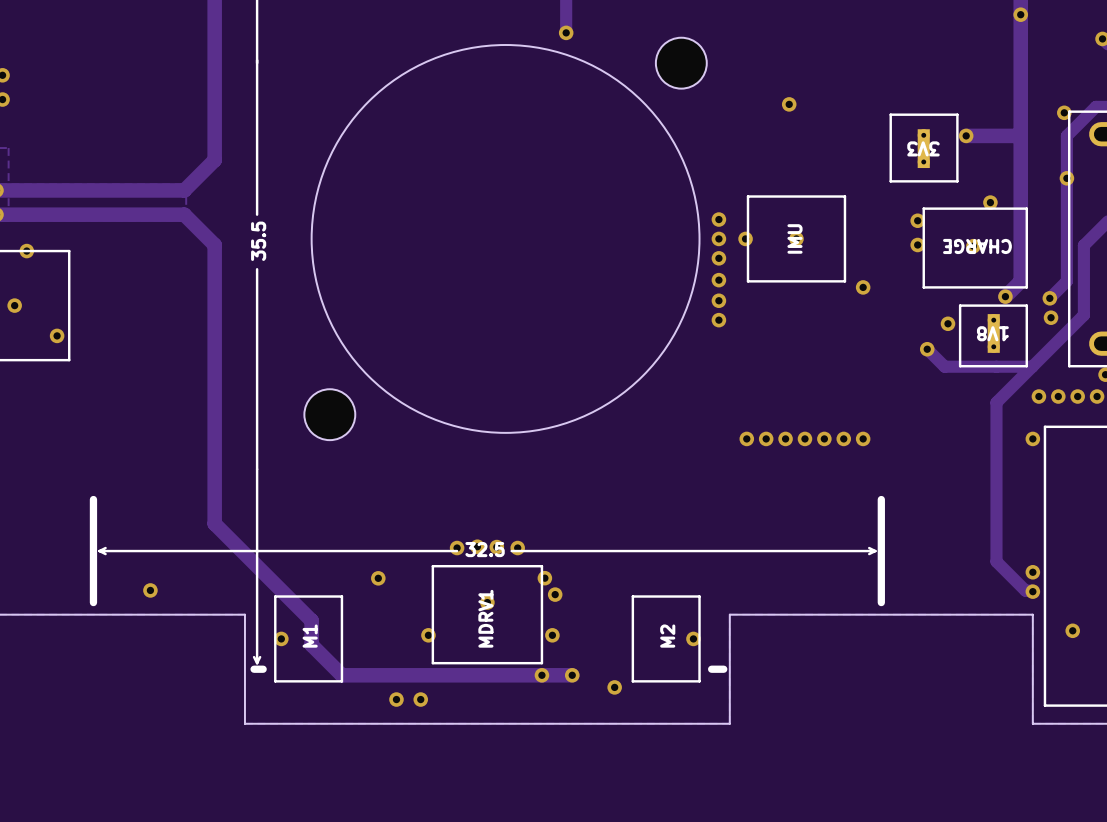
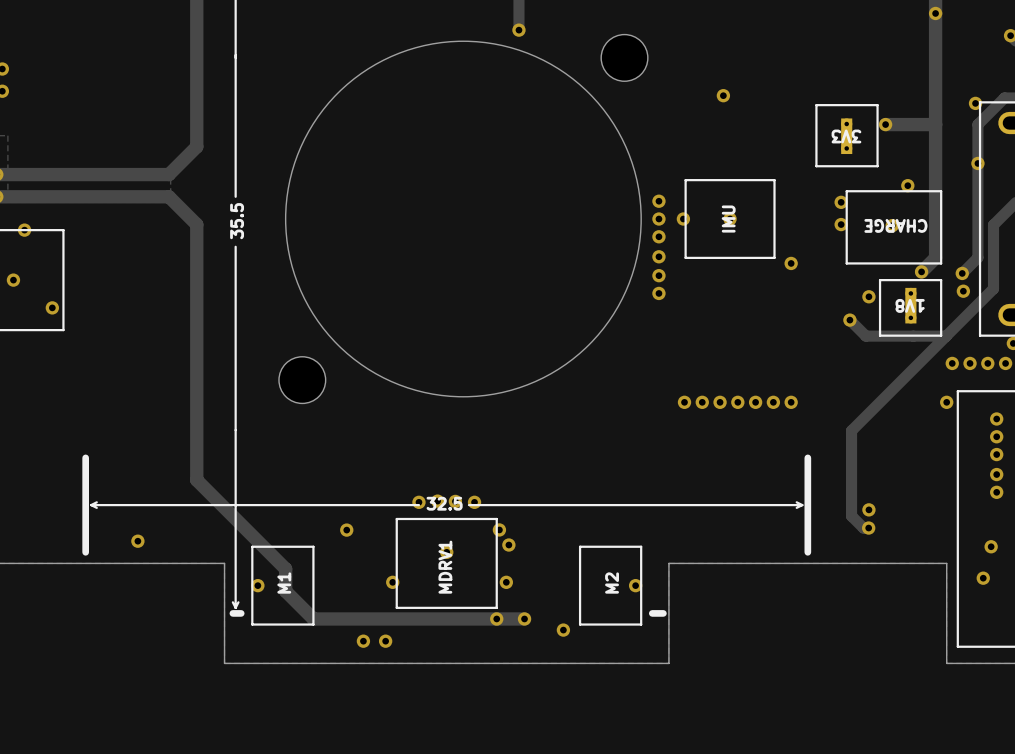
track: (996, 402) (996, 561) (1025, 590) (1032, 591) -> (913, 368) (851, 430) (851, 516) (863, 528) (868, 528)
via: none -> (996, 418)
via: none -> (996, 436)
via: none -> (996, 454)
via: none -> (996, 474)
via: none -> (996, 492)
via: none -> (868, 509)
via: (1032, 572) -> none
via: none -> (868, 528)
via: (1032, 591) -> none
via: none -> (991, 546)

